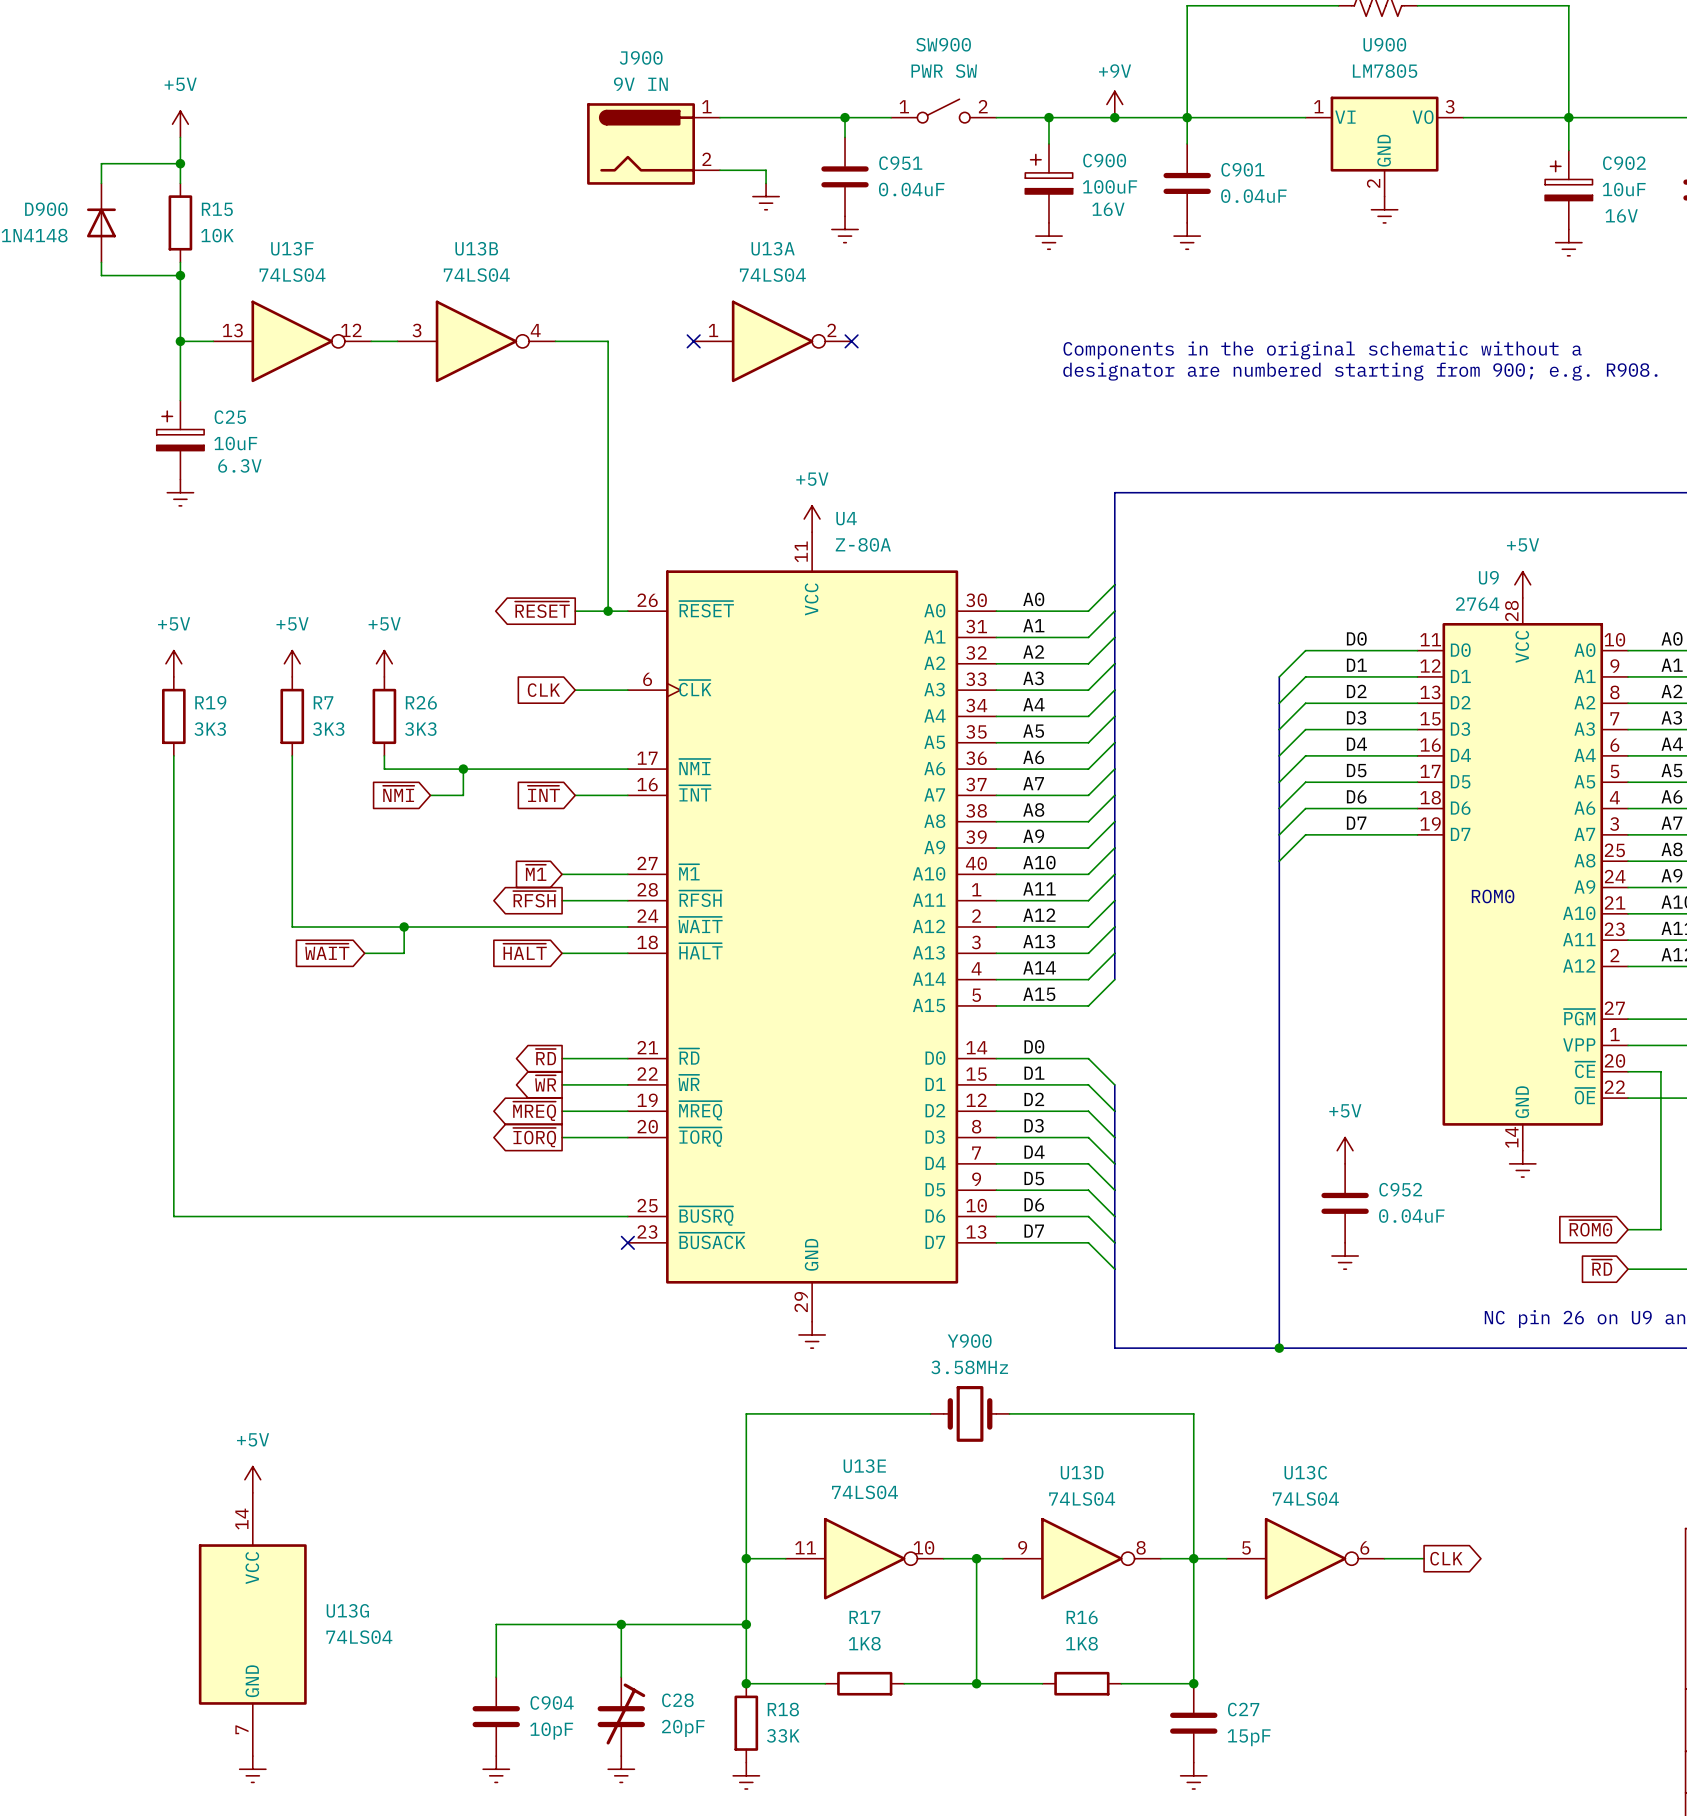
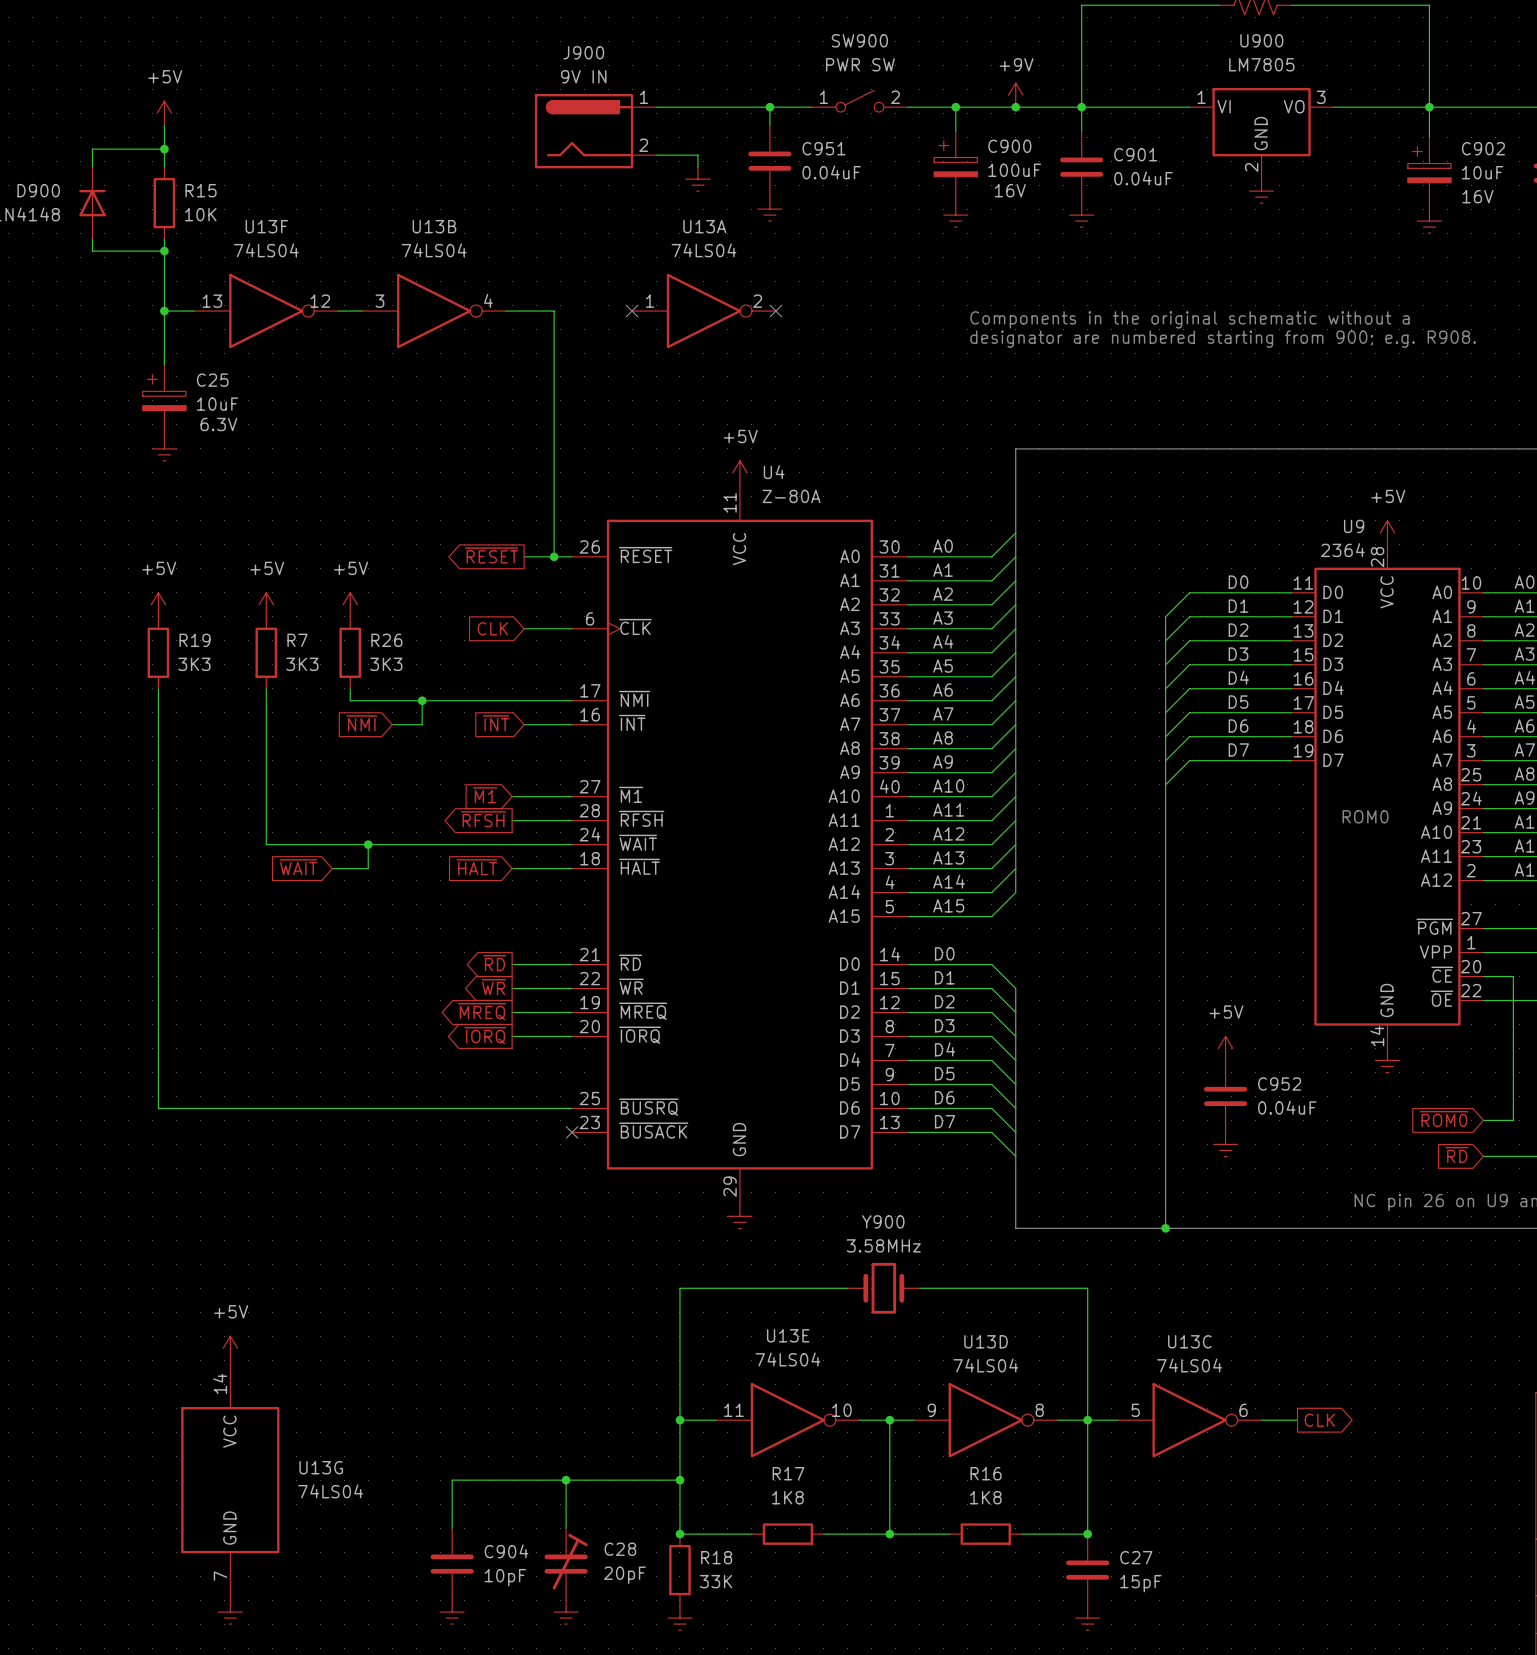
U9 value: 2764 (1477, 604) -> 2364 (1342, 550)

